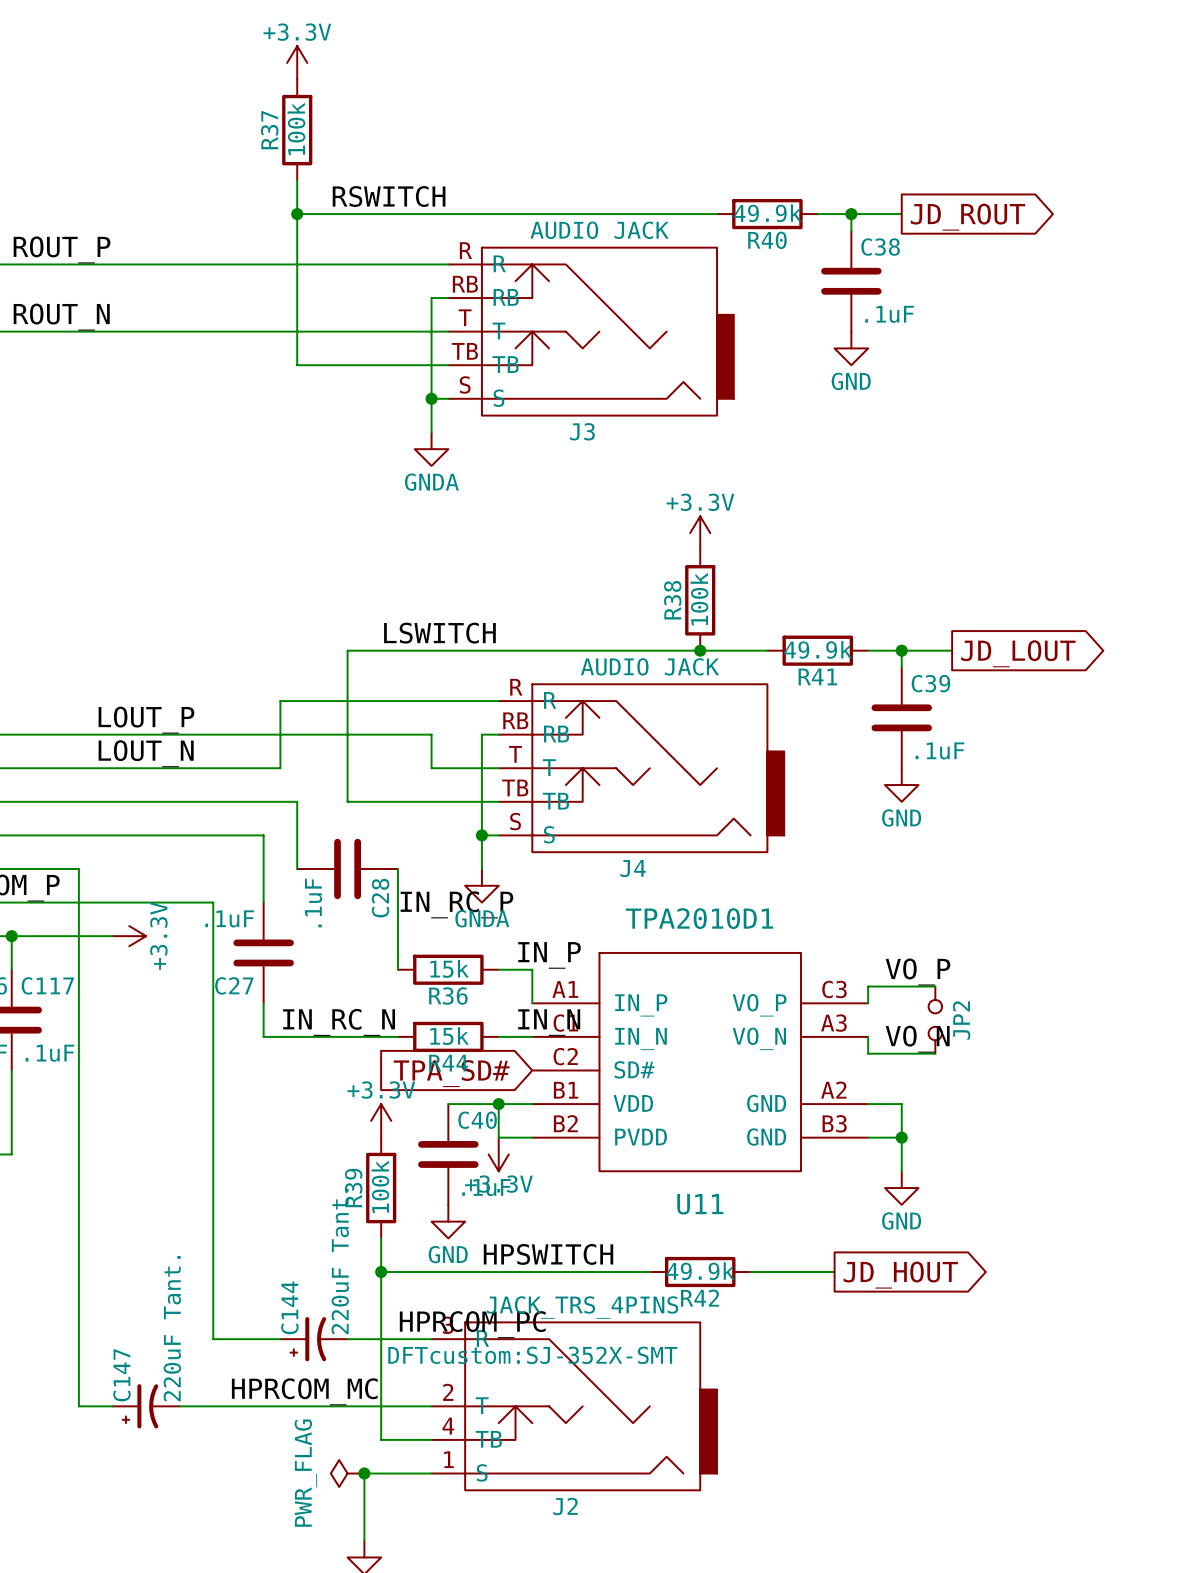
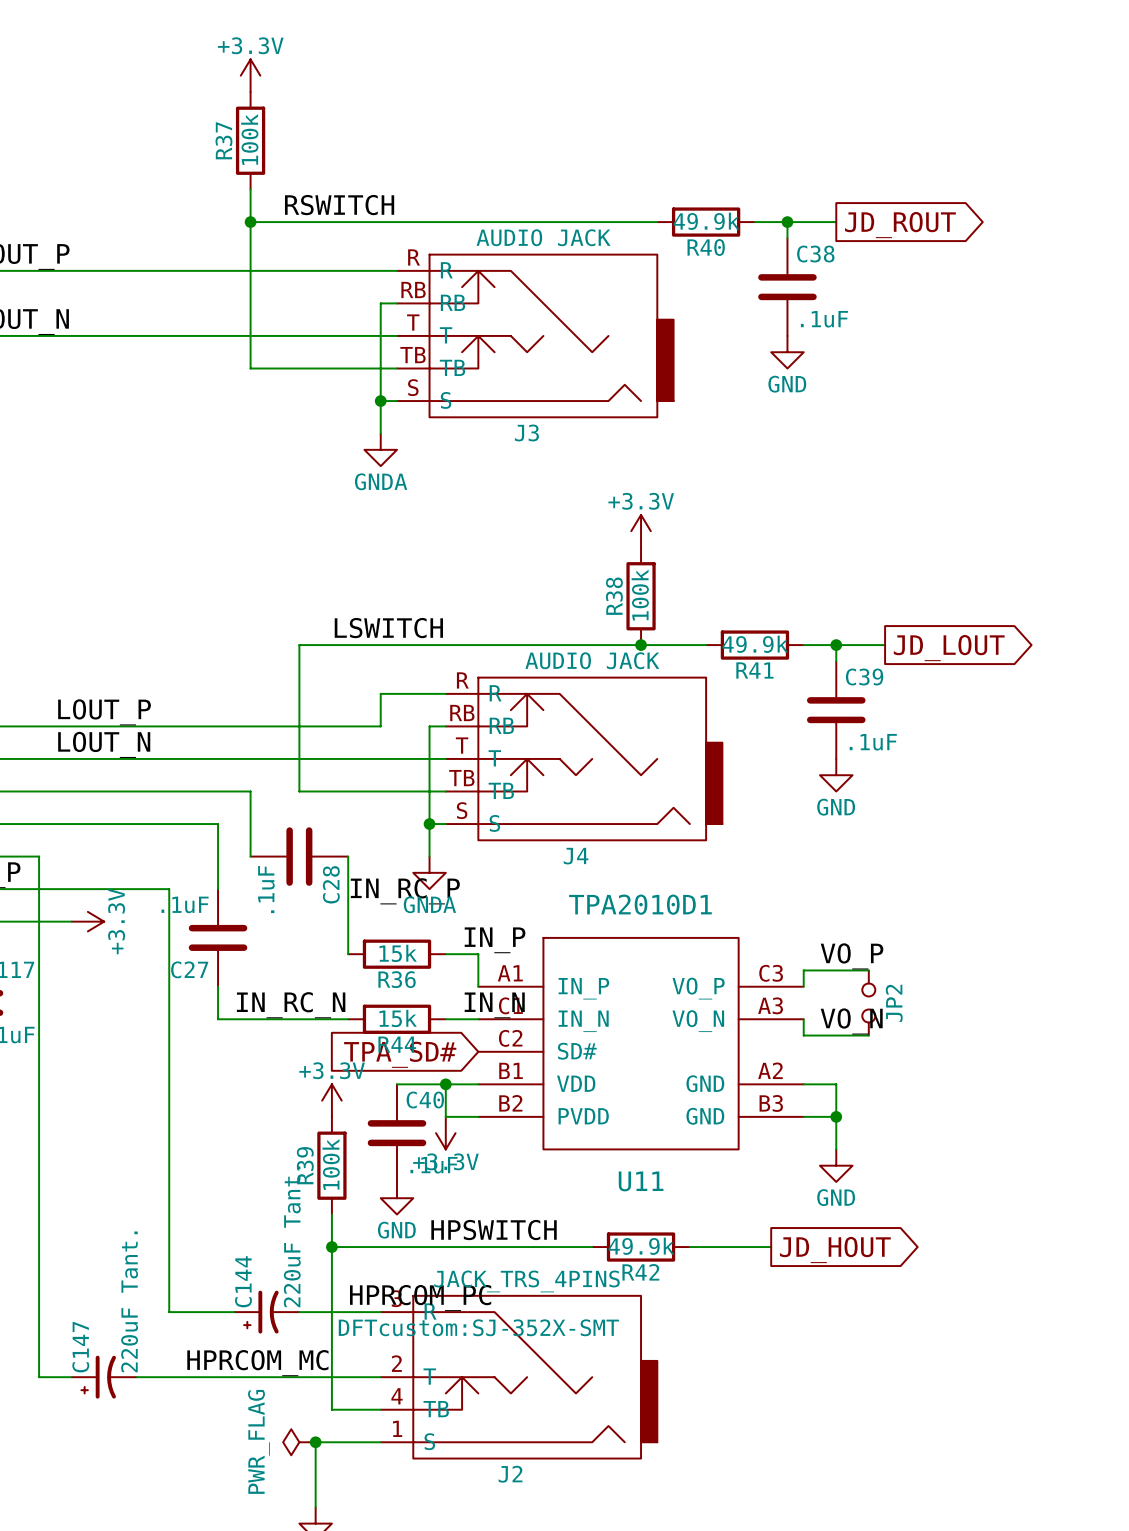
wire: (431, 701) (280, 701) (280, 768) -> (380, 758) (234, 758)
wire: (431, 734) (431, 768) -> (380, 726) (380, 693)

